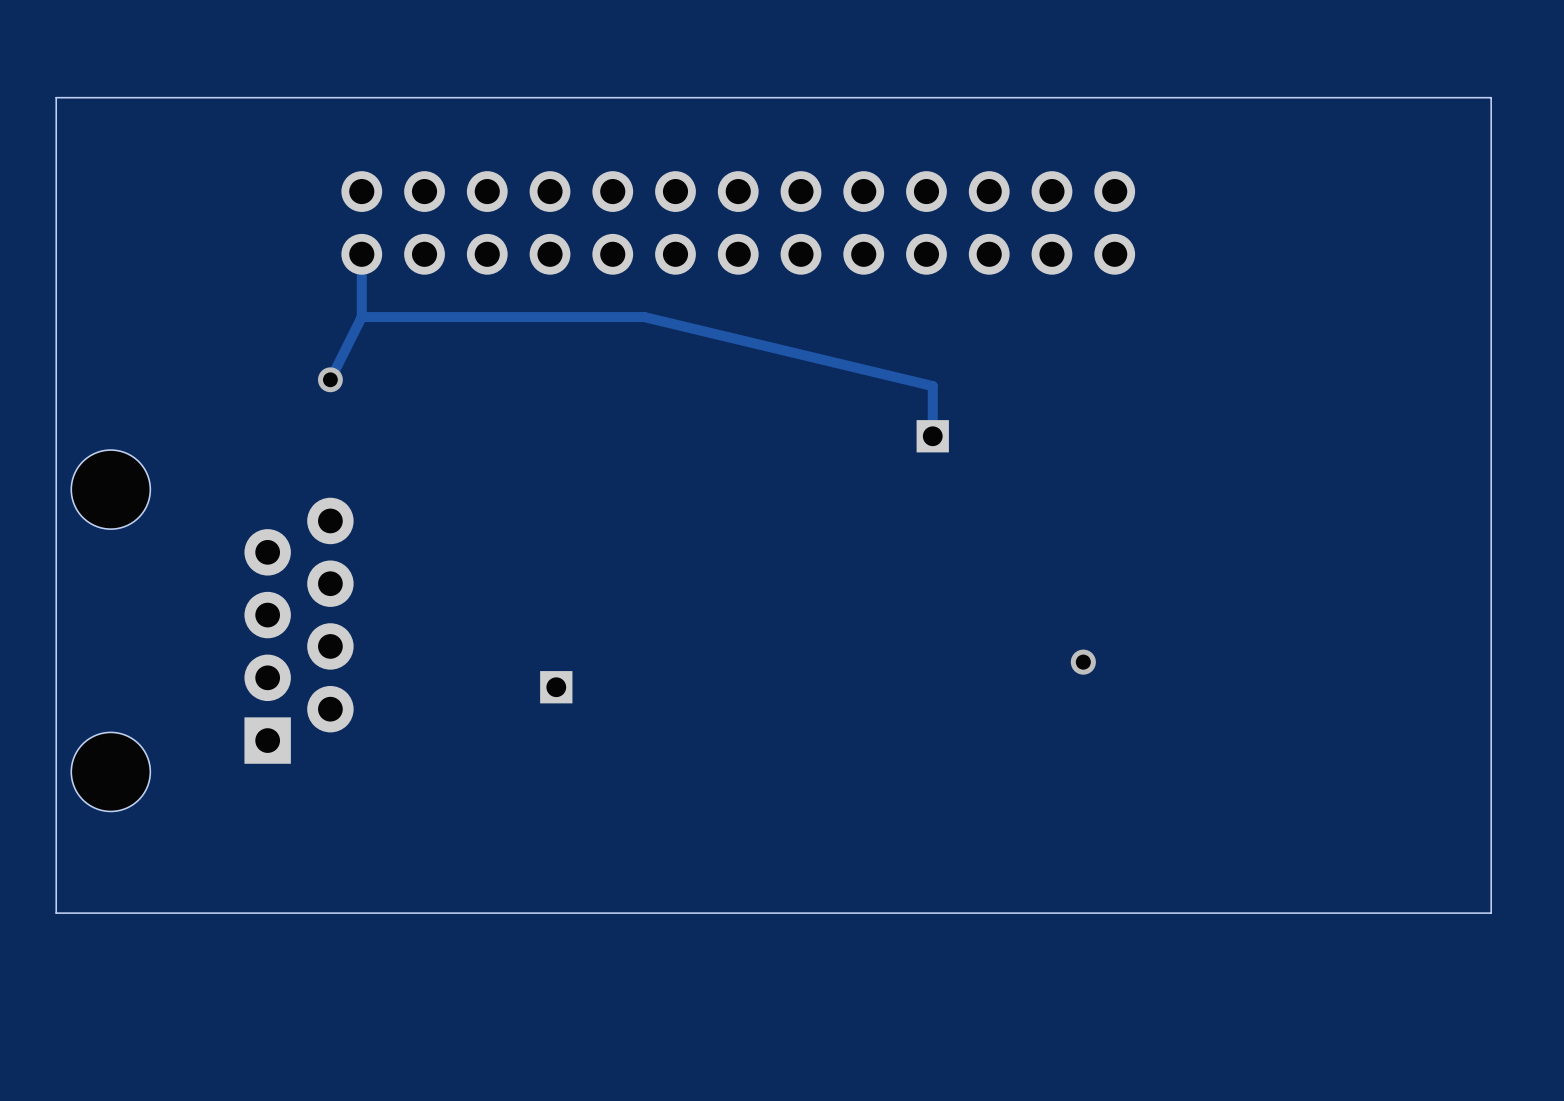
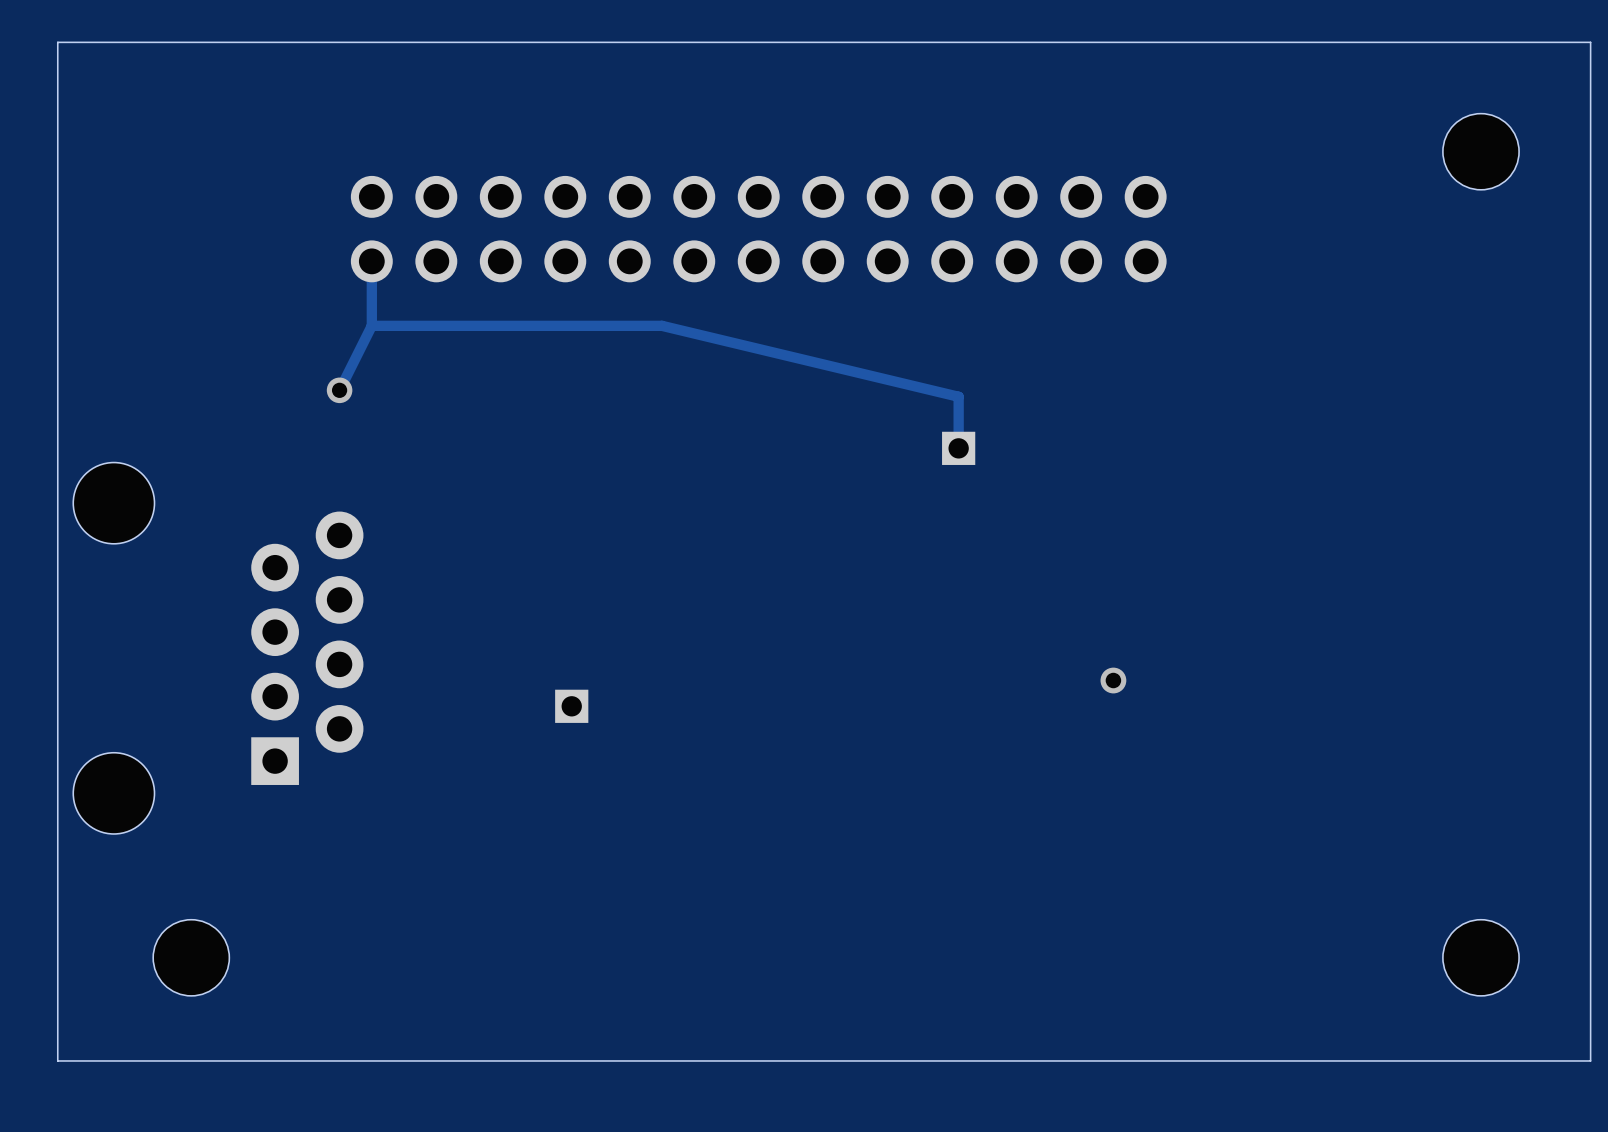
board edge: (56, 97) (1491, 97) (1491, 913) (56, 913) -> (57, 100) (57, 42) (1590, 42) (1590, 1060) (57, 1060) (57, 938)
part: none -> (1480, 151)
part: none -> (191, 957)
part: none -> (1480, 957)

